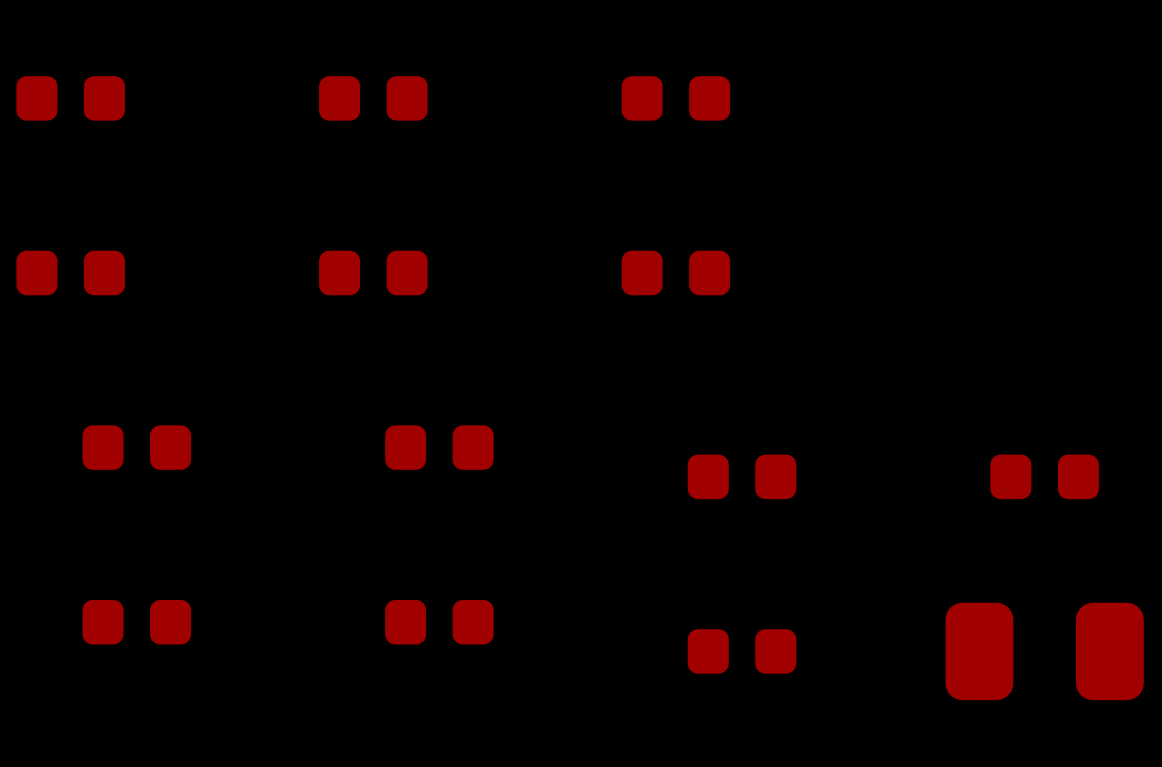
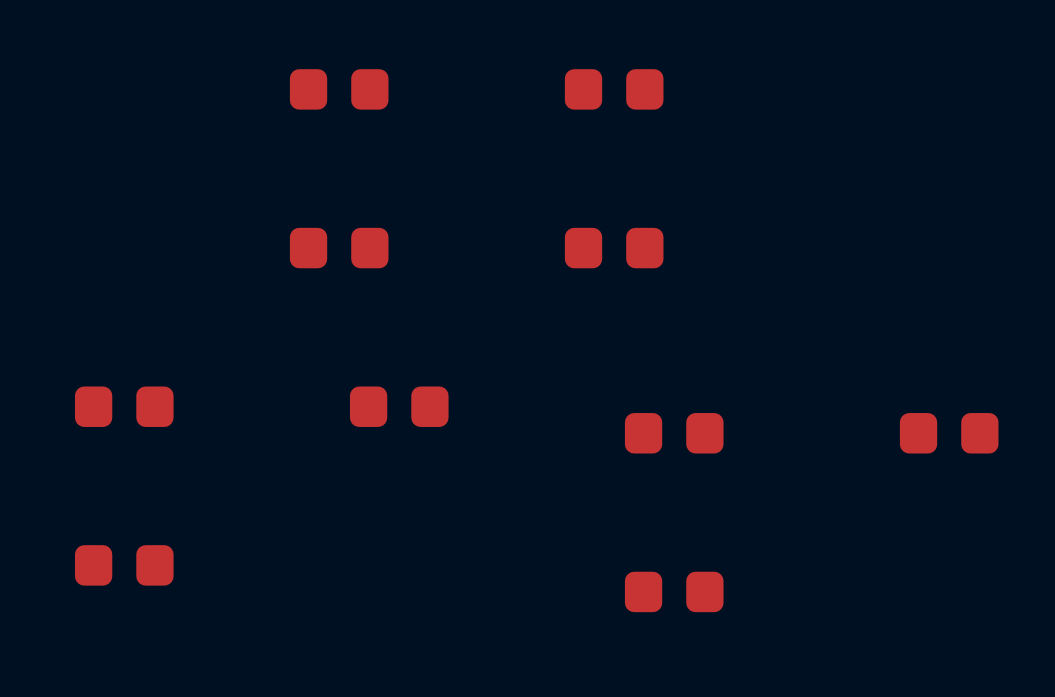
part: (70, 98) -> none
part: (70, 273) -> none
part: (439, 622) -> none
part: (1044, 651) -> none

